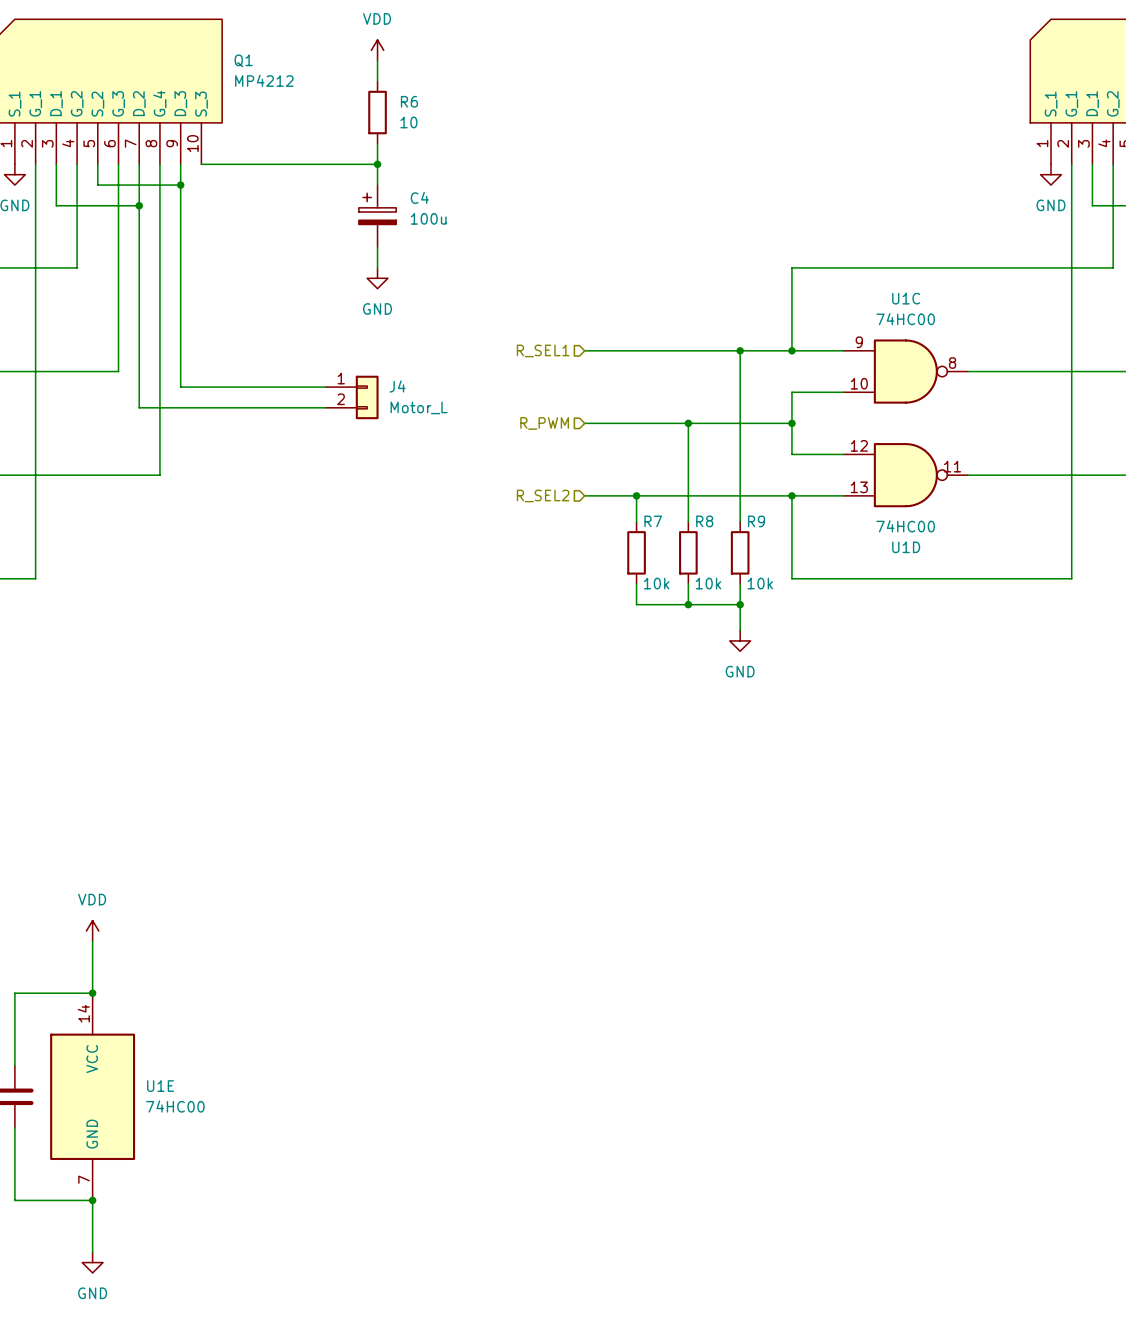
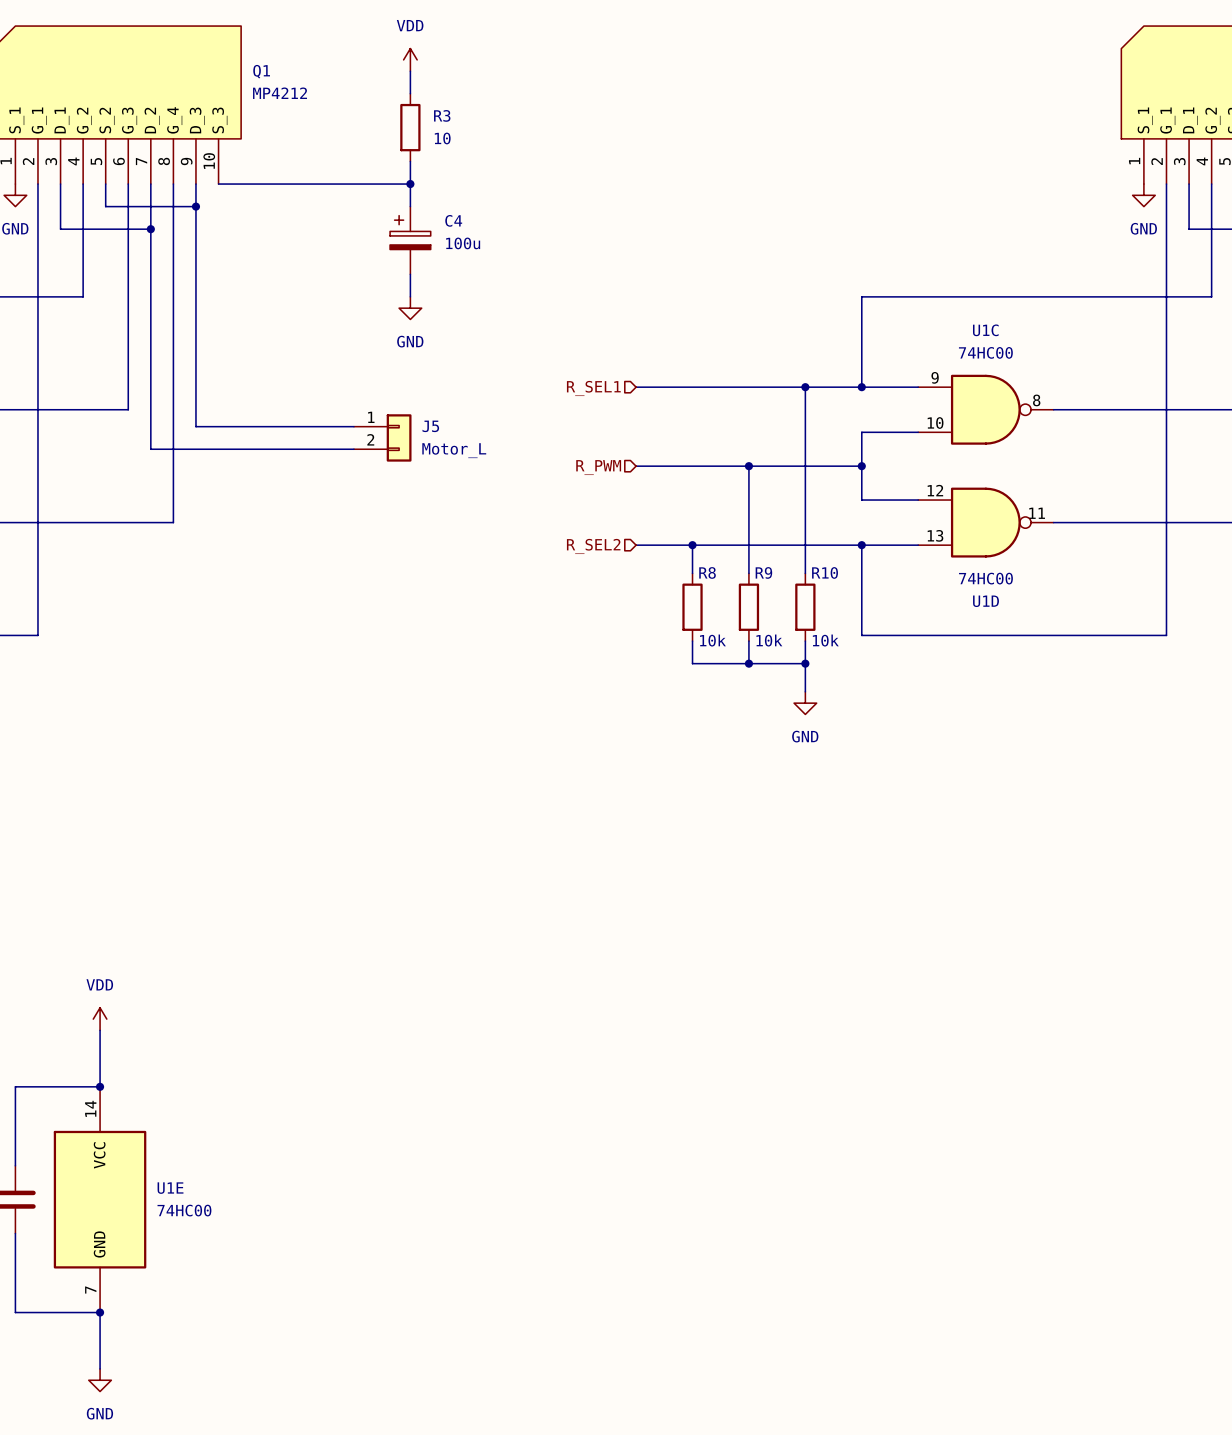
R6 name: R6 (409, 101) -> R3 (442, 115)
J4 name: J4 (397, 386) -> J5 (430, 426)
R7 name: R7 (653, 521) -> R8 (707, 572)
R8 name: R8 (704, 521) -> R9 (763, 572)
R9 name: R9 (756, 521) -> R10 (825, 572)

